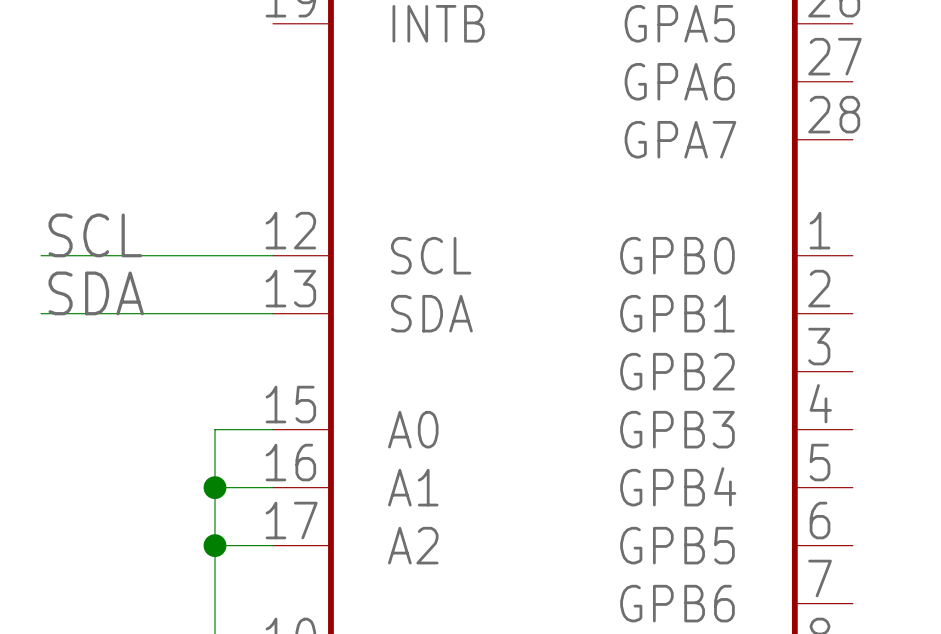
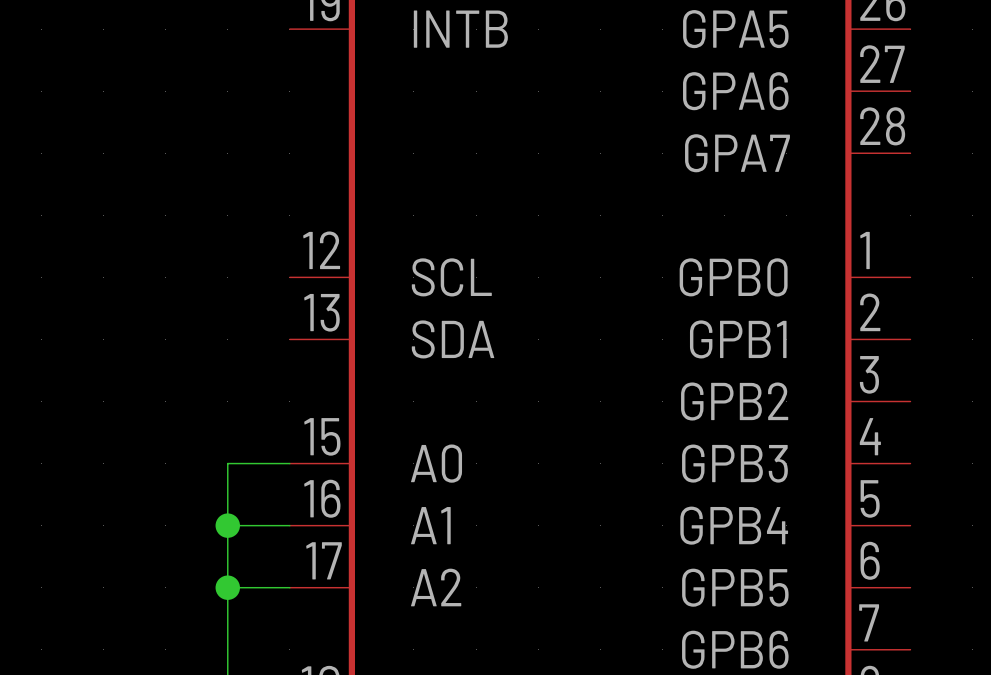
label: SCL (95, 235) -> none
wire: (41, 255) (272, 255) -> none
label: SDA (96, 293) -> none
wire: (41, 313) (272, 313) -> none

